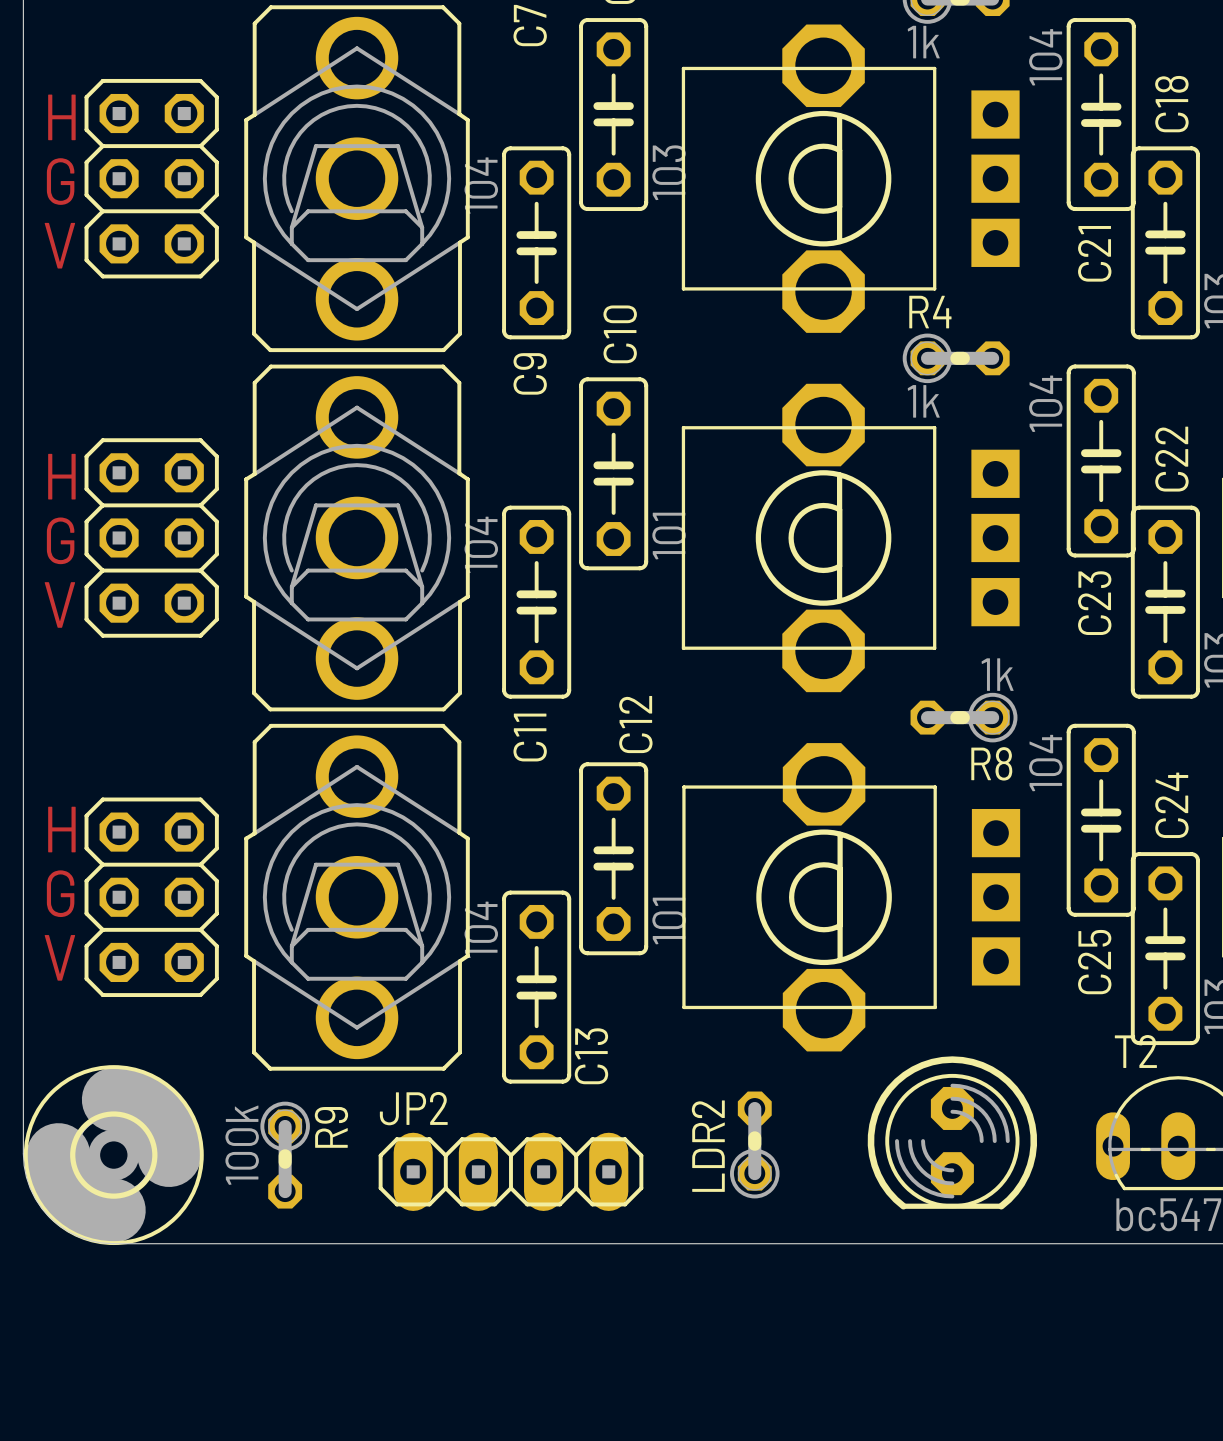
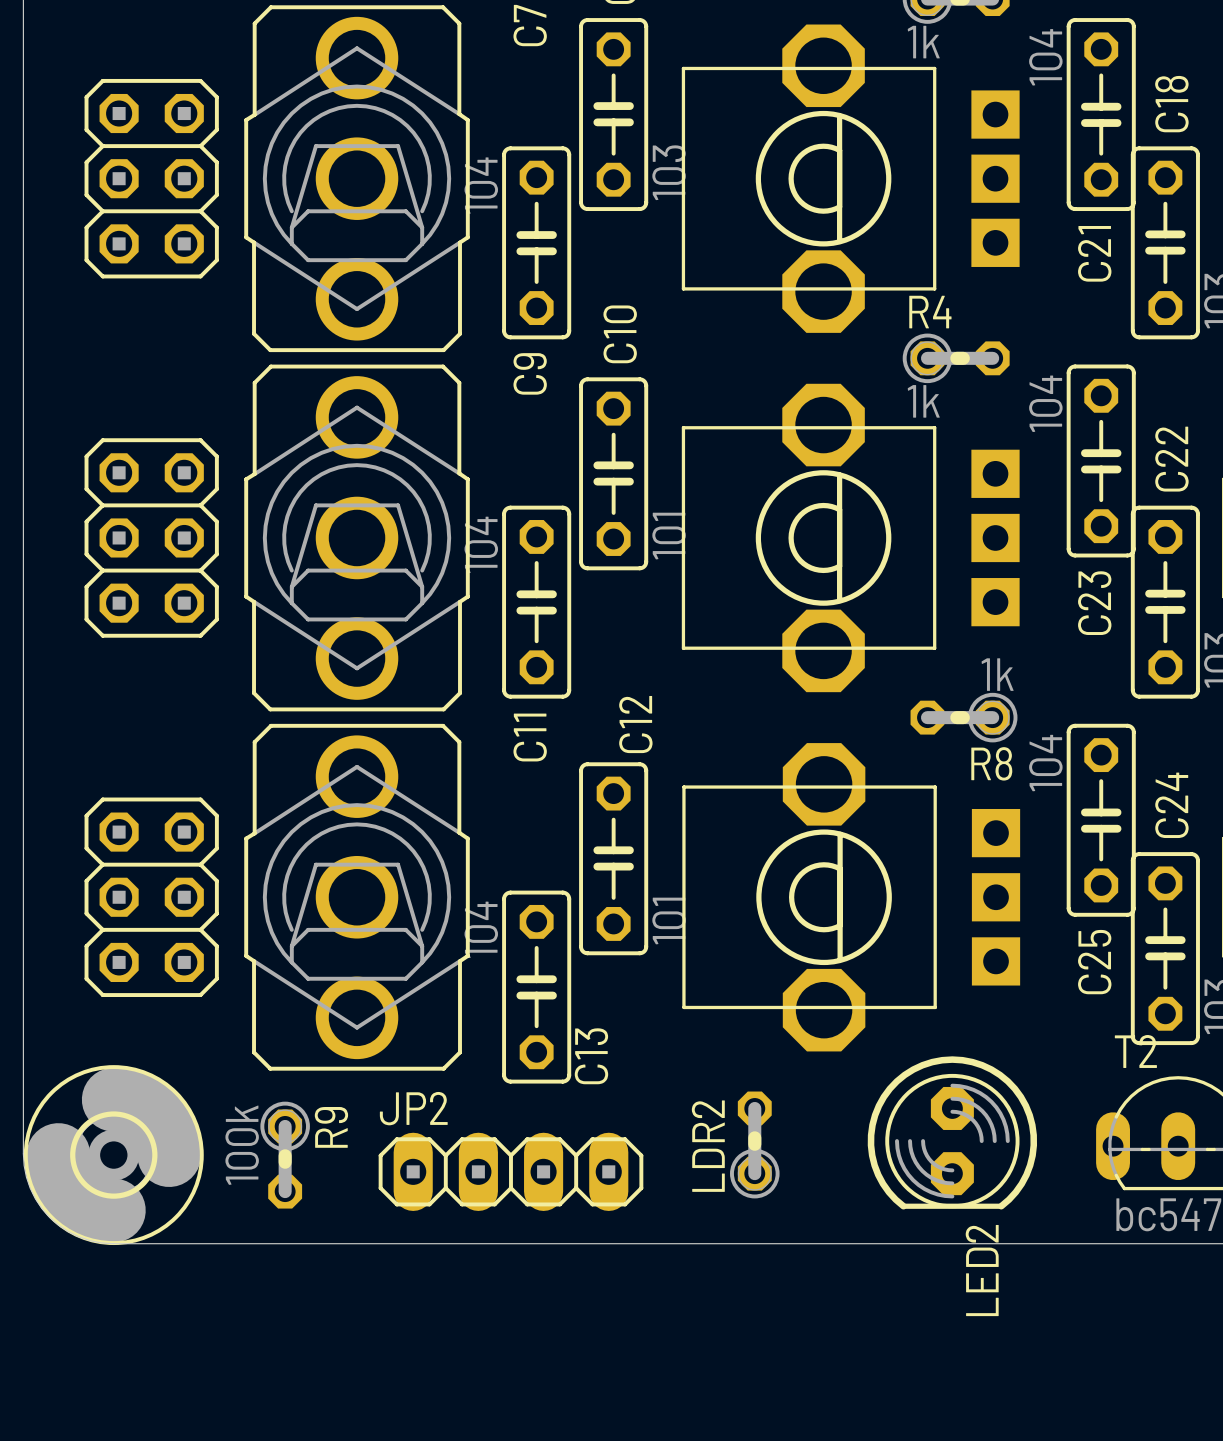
text: H (61, 117) -> none
text: G (60, 181) -> none
text: V (59, 245) -> none
text: H (61, 476) -> none
text: G (60, 540) -> none
text: V (59, 604) -> none
text: H (61, 829) -> none
text: G (60, 893) -> none
text: V (59, 957) -> none
LED2 name: none -> LED2 (982, 1270)

